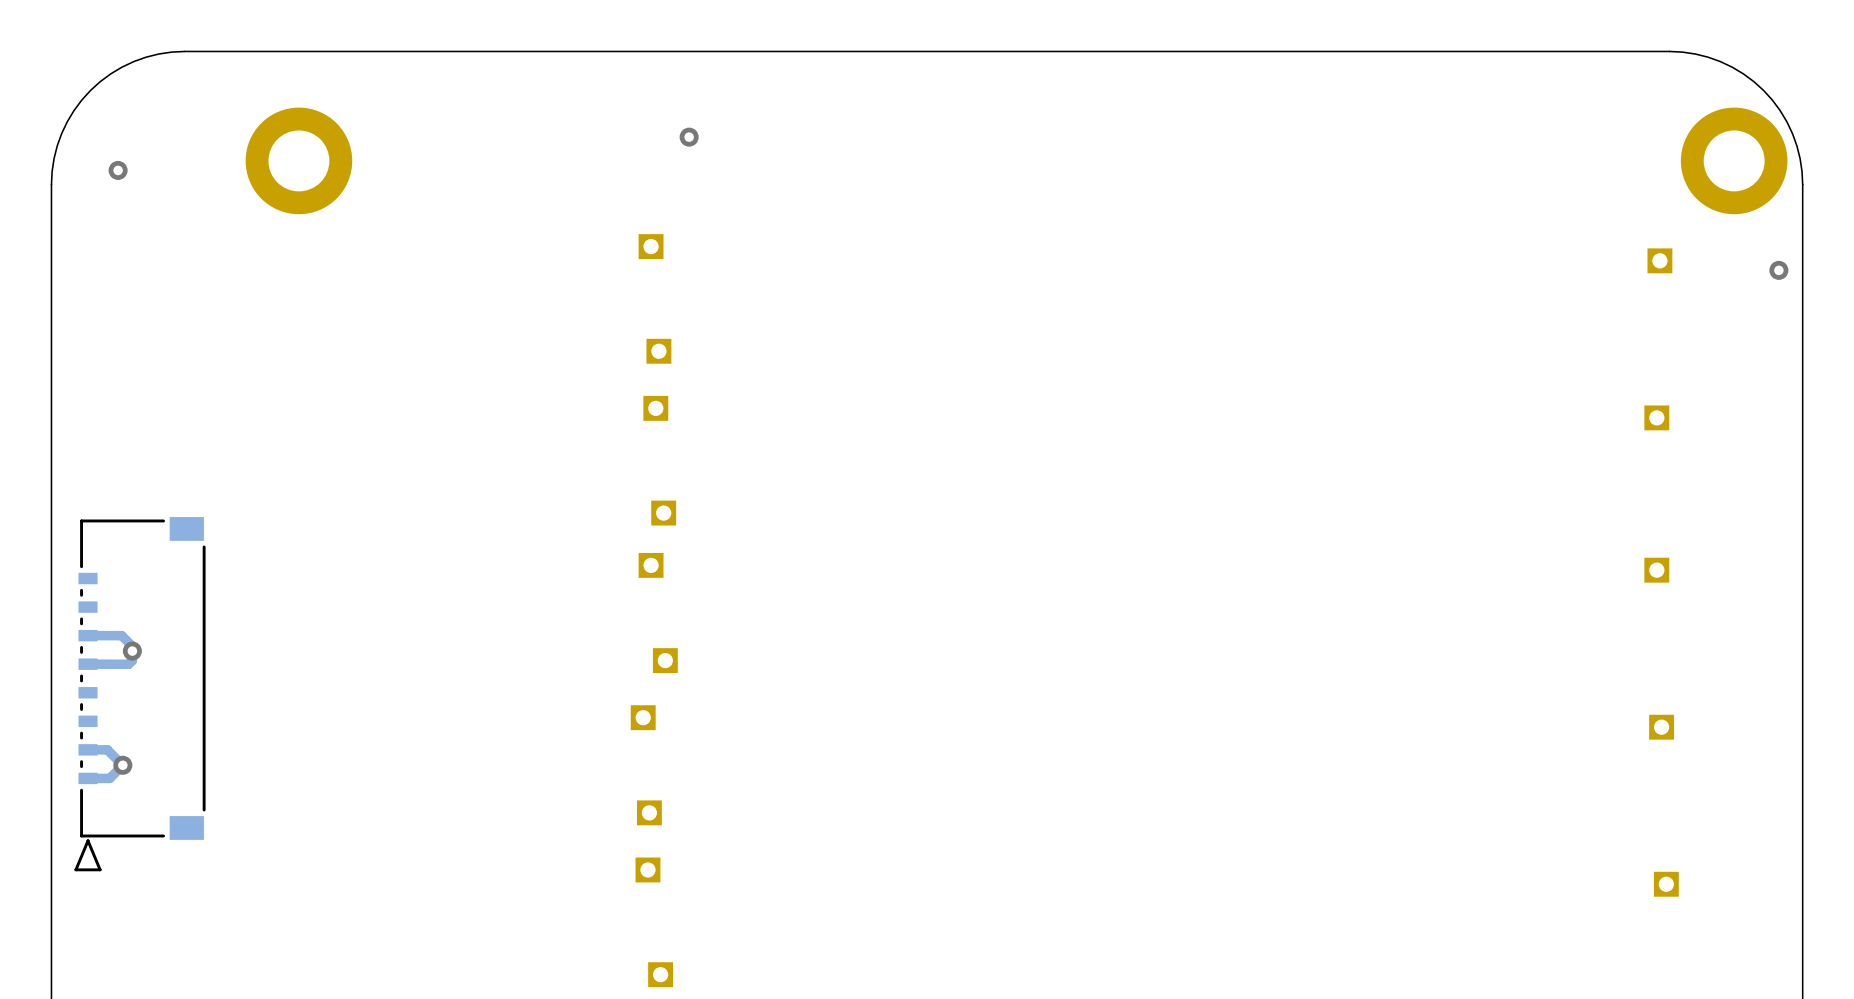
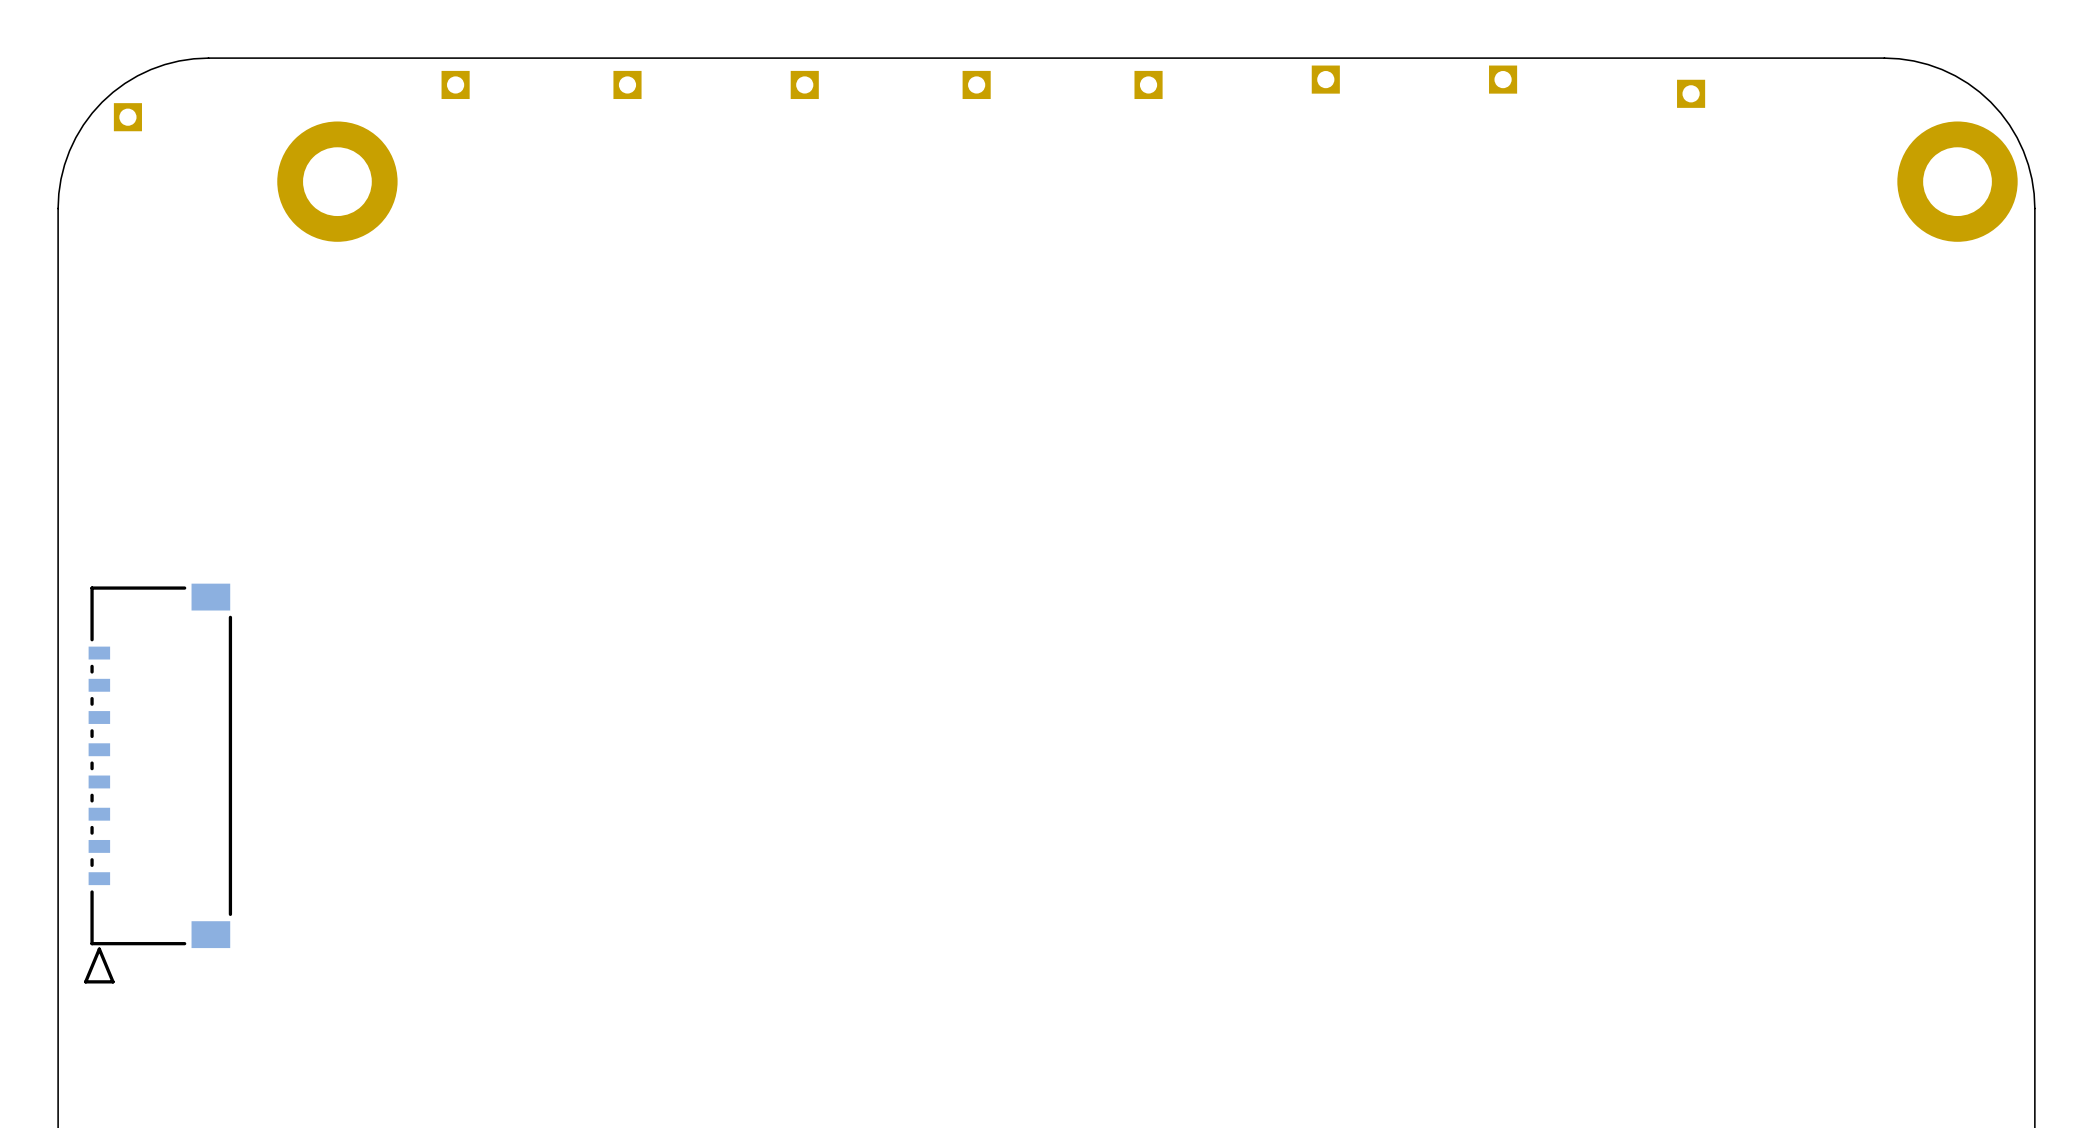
part: none -> (1325, 79)
part: none -> (1503, 79)
part: none -> (455, 84)
part: none -> (627, 84)
part: none -> (804, 84)
part: none -> (976, 84)
part: none -> (1148, 84)
part: none -> (1691, 93)
part: none -> (127, 117)
via: (689, 137) -> none
via: (118, 170) -> none
part: (651, 246) -> none
part: (1659, 260) -> none
via: (1778, 270) -> none
part: (658, 351) -> none
part: (655, 408) -> none
part: (1656, 417) -> none
part: (663, 513) -> none
part: (651, 565) -> none
part: (1656, 570) -> none
track: (88, 635) (121, 635) (132, 646) (132, 660) (128, 664) (88, 664) -> none
via: (132, 651) -> none
part: (665, 660) -> none
part: (643, 717) -> none
part: (1661, 727) -> none
track: (88, 749) (107, 749) (122, 765) (109, 778) (88, 778) -> none
via: (122, 765) -> none
part: (649, 812) -> none
part: (647, 869) -> none
part: (1666, 884) -> none
part: (660, 974) -> none

